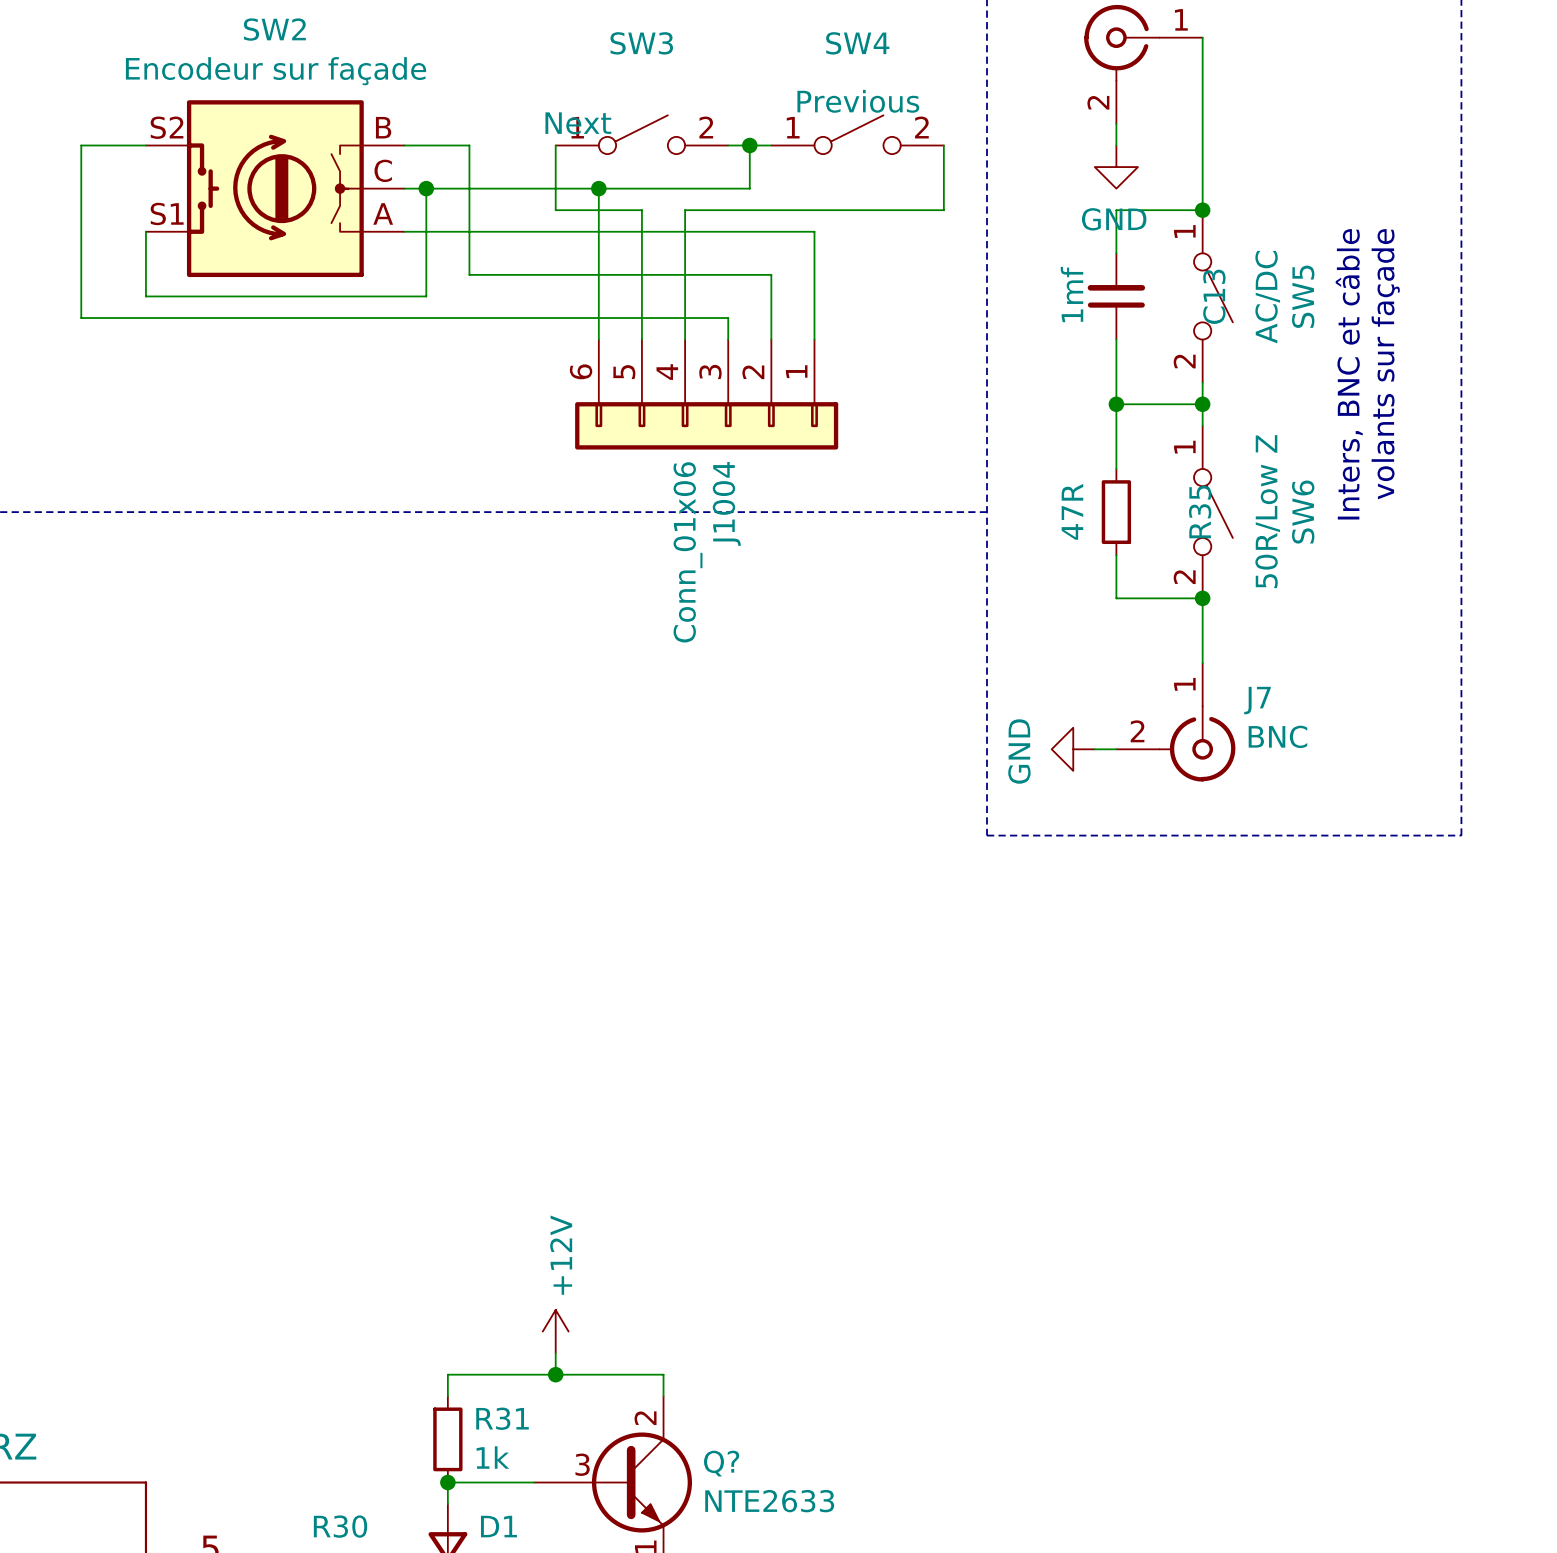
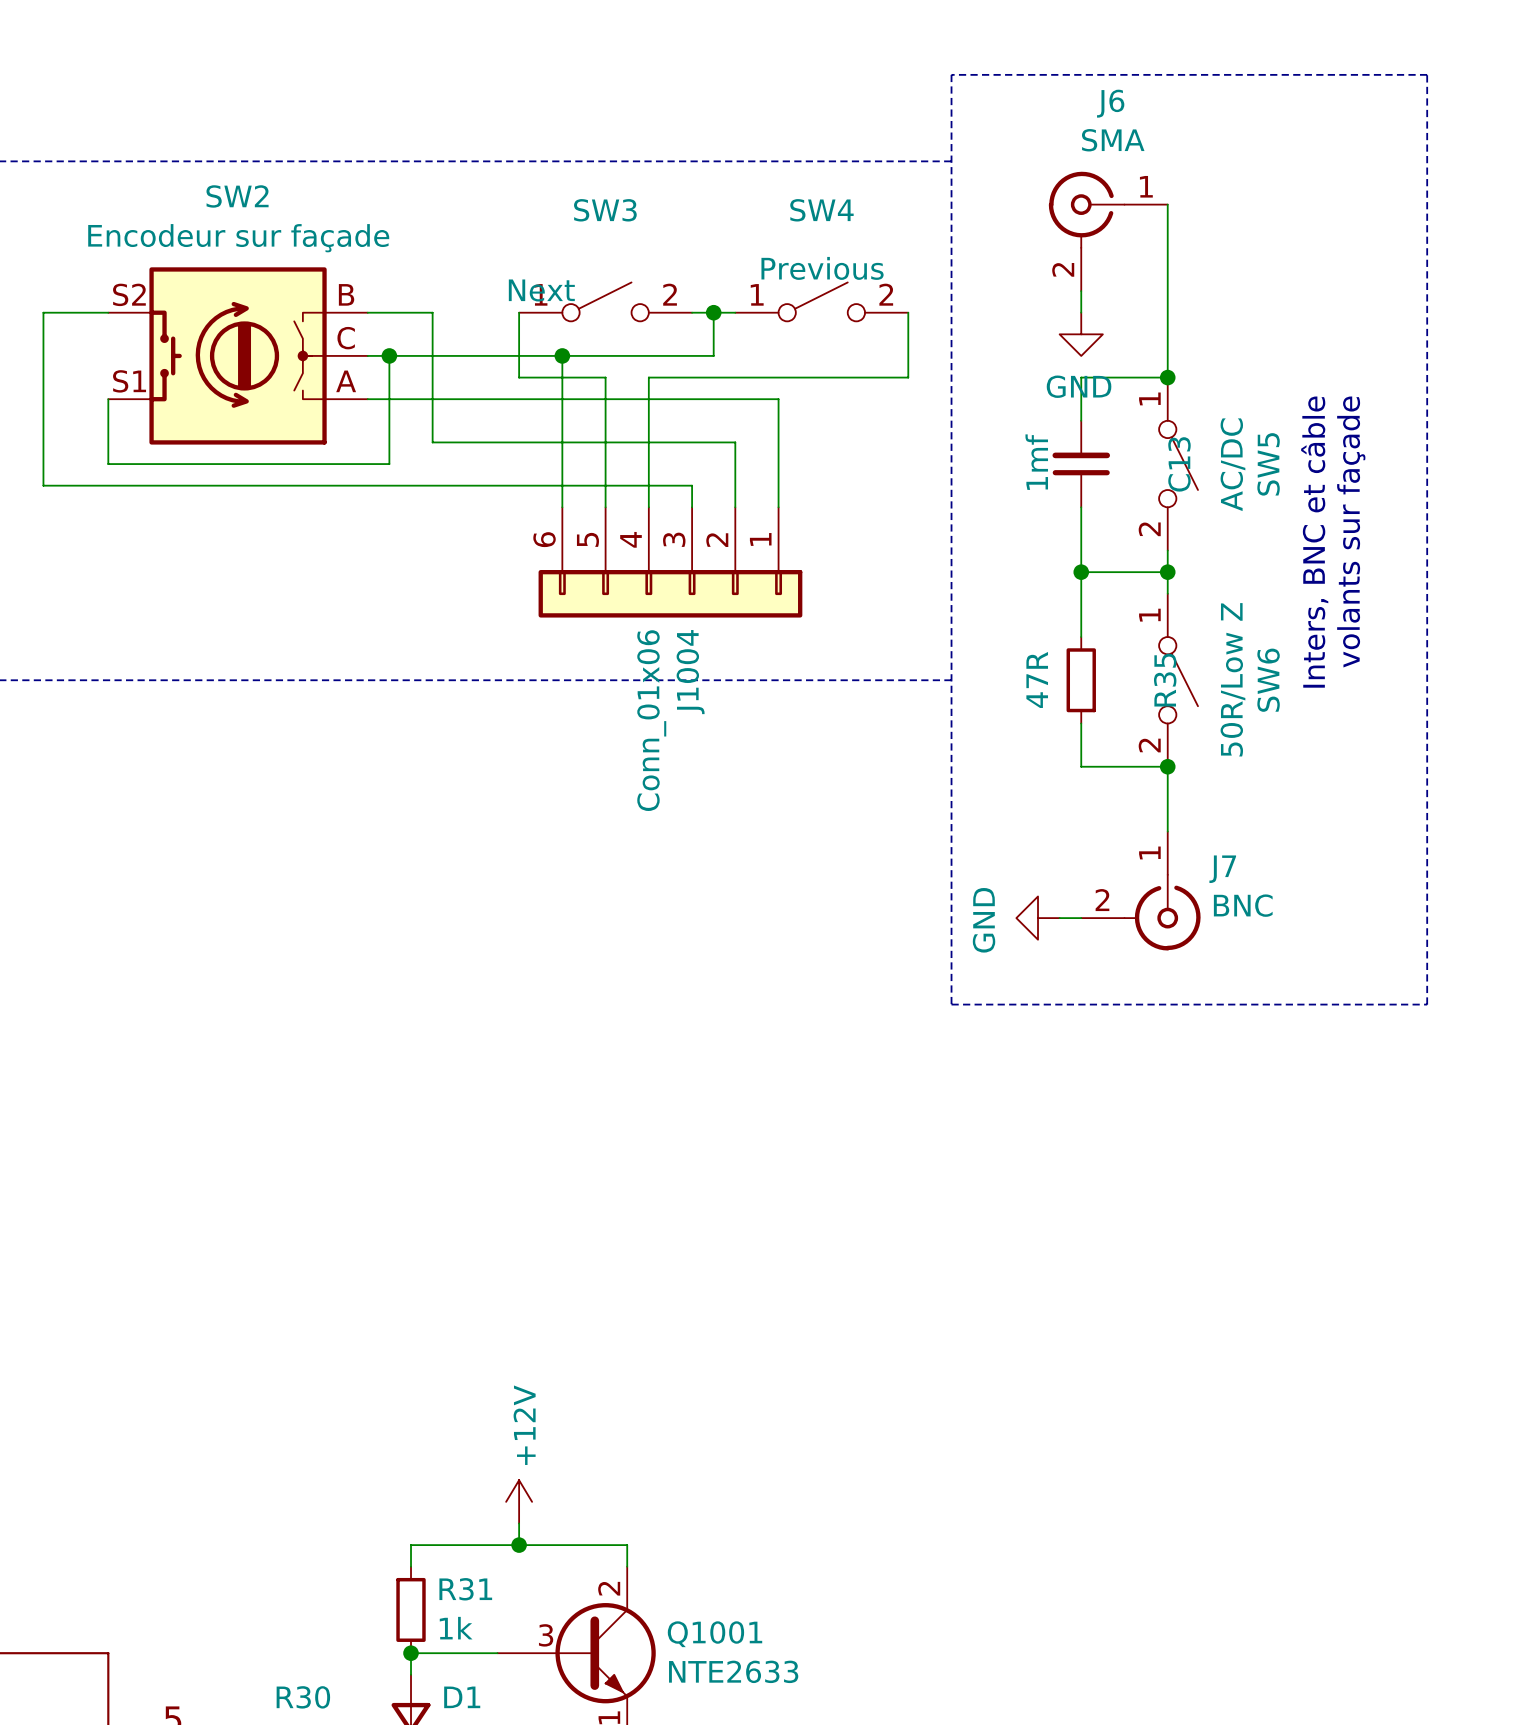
Q? name: Q? (721, 1463) -> Q1001 (715, 1634)

